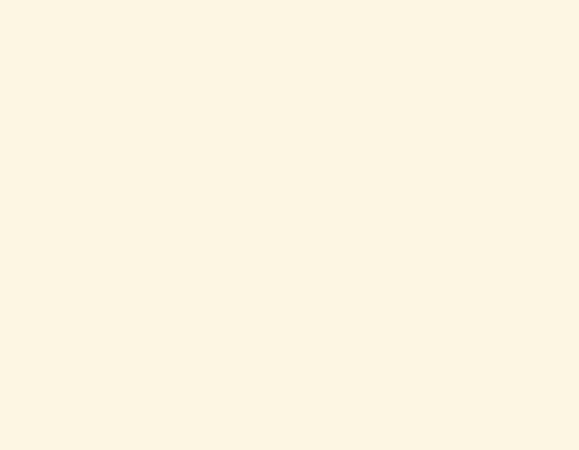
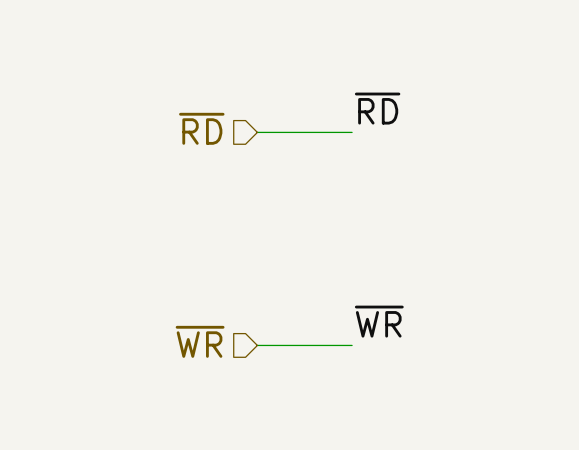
label: none -> ~{RD} (377, 108)
hierarchical label: none -> ~{RD} (201, 128)
wire: none -> (257, 132) (352, 132)
label: none -> ~{WR} (379, 321)
hierarchical label: none -> ~{WR} (200, 341)
wire: none -> (257, 345) (352, 345)

